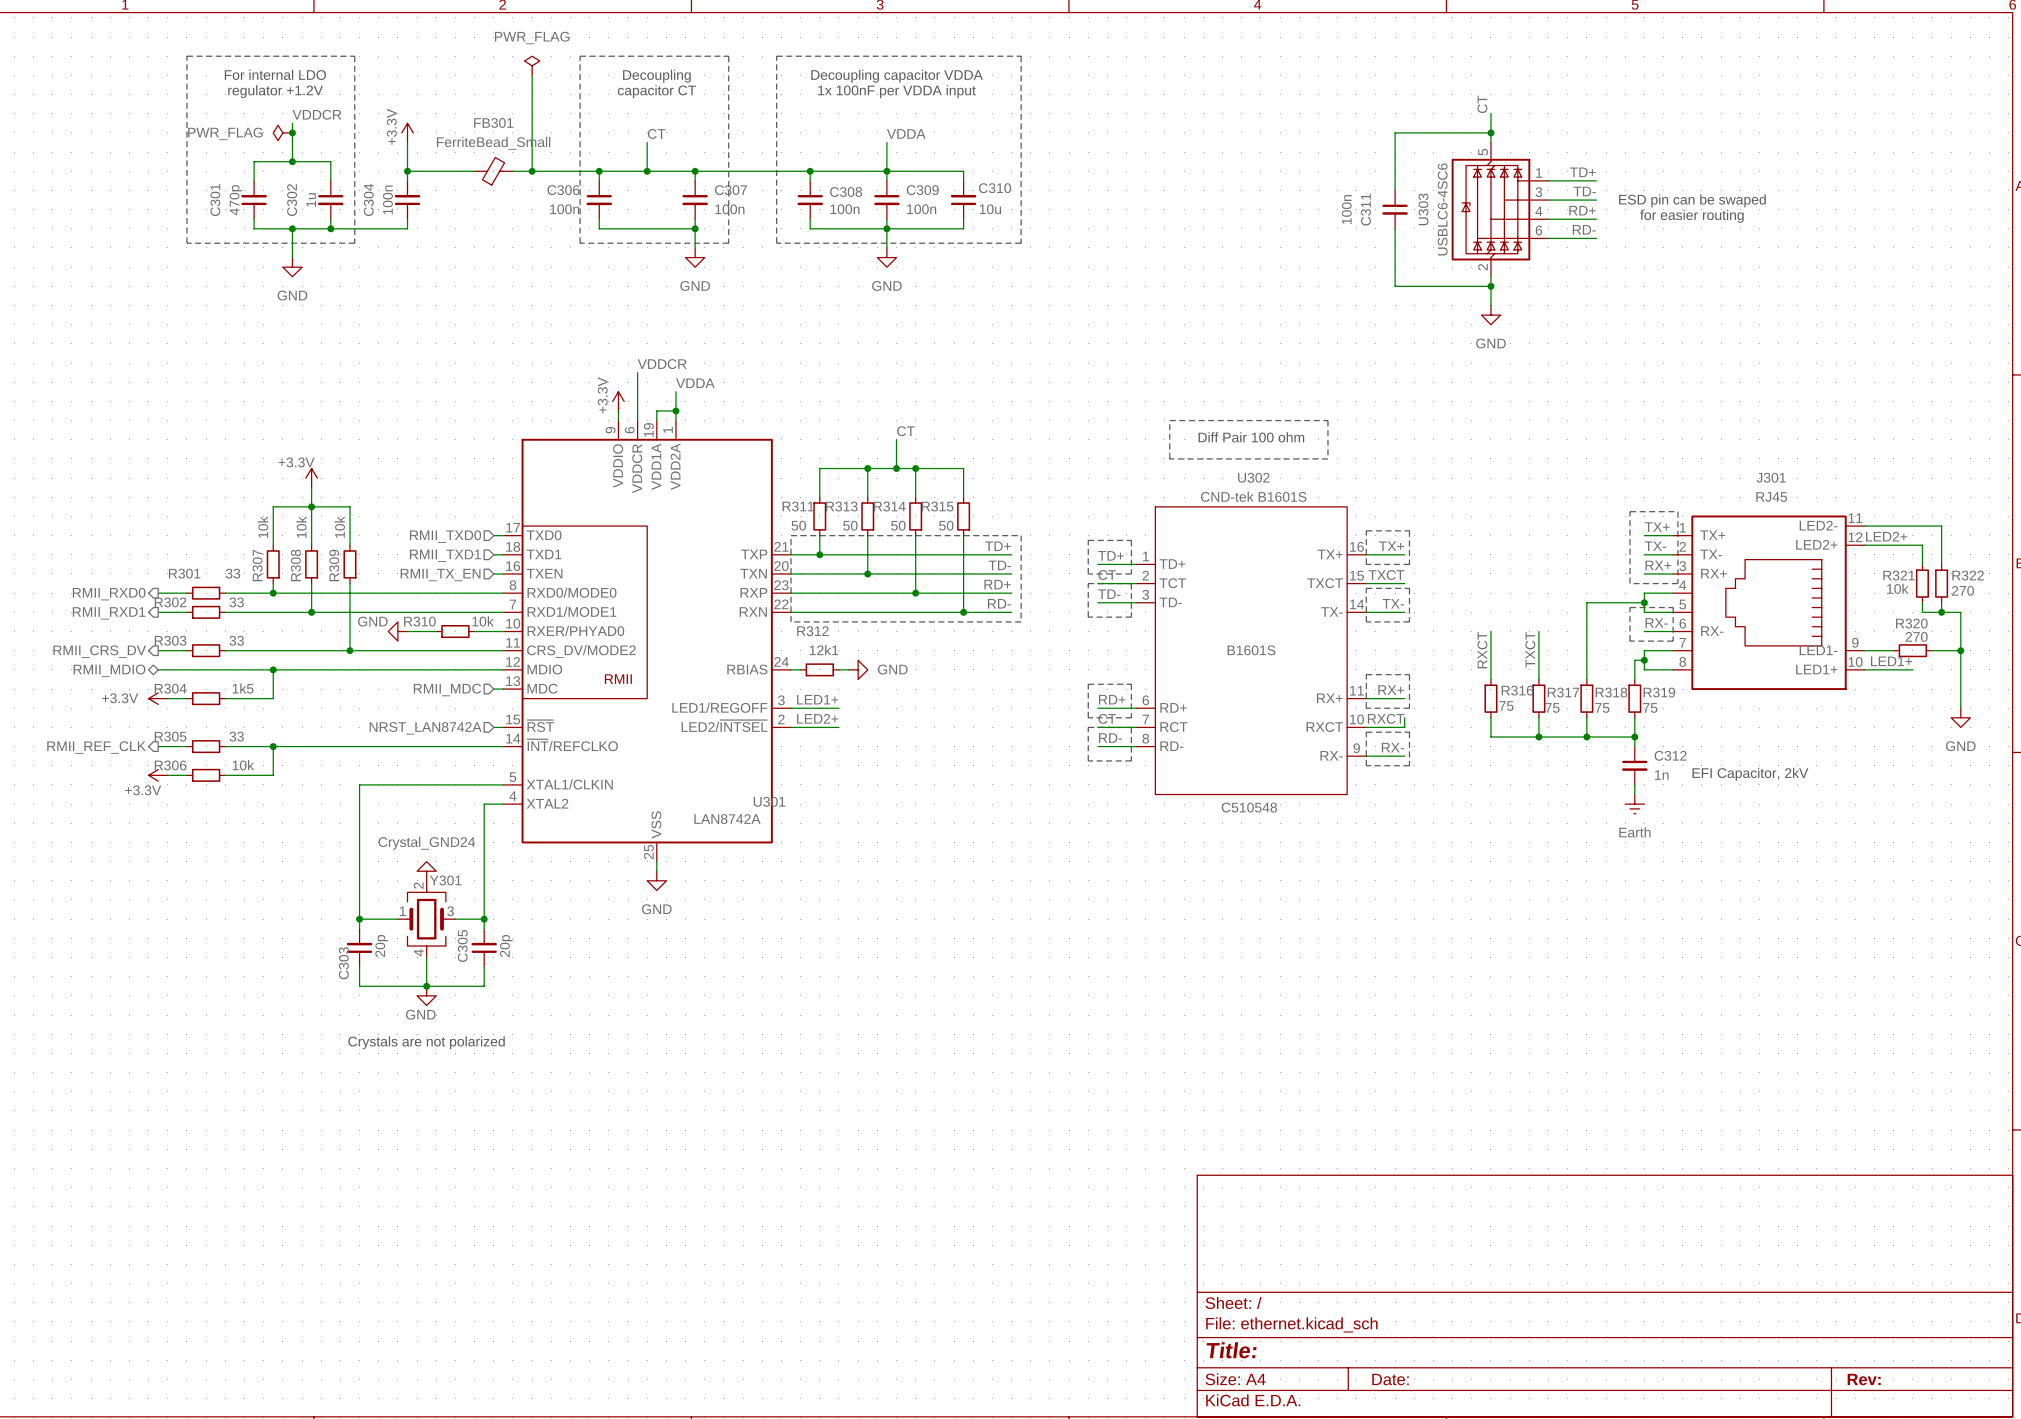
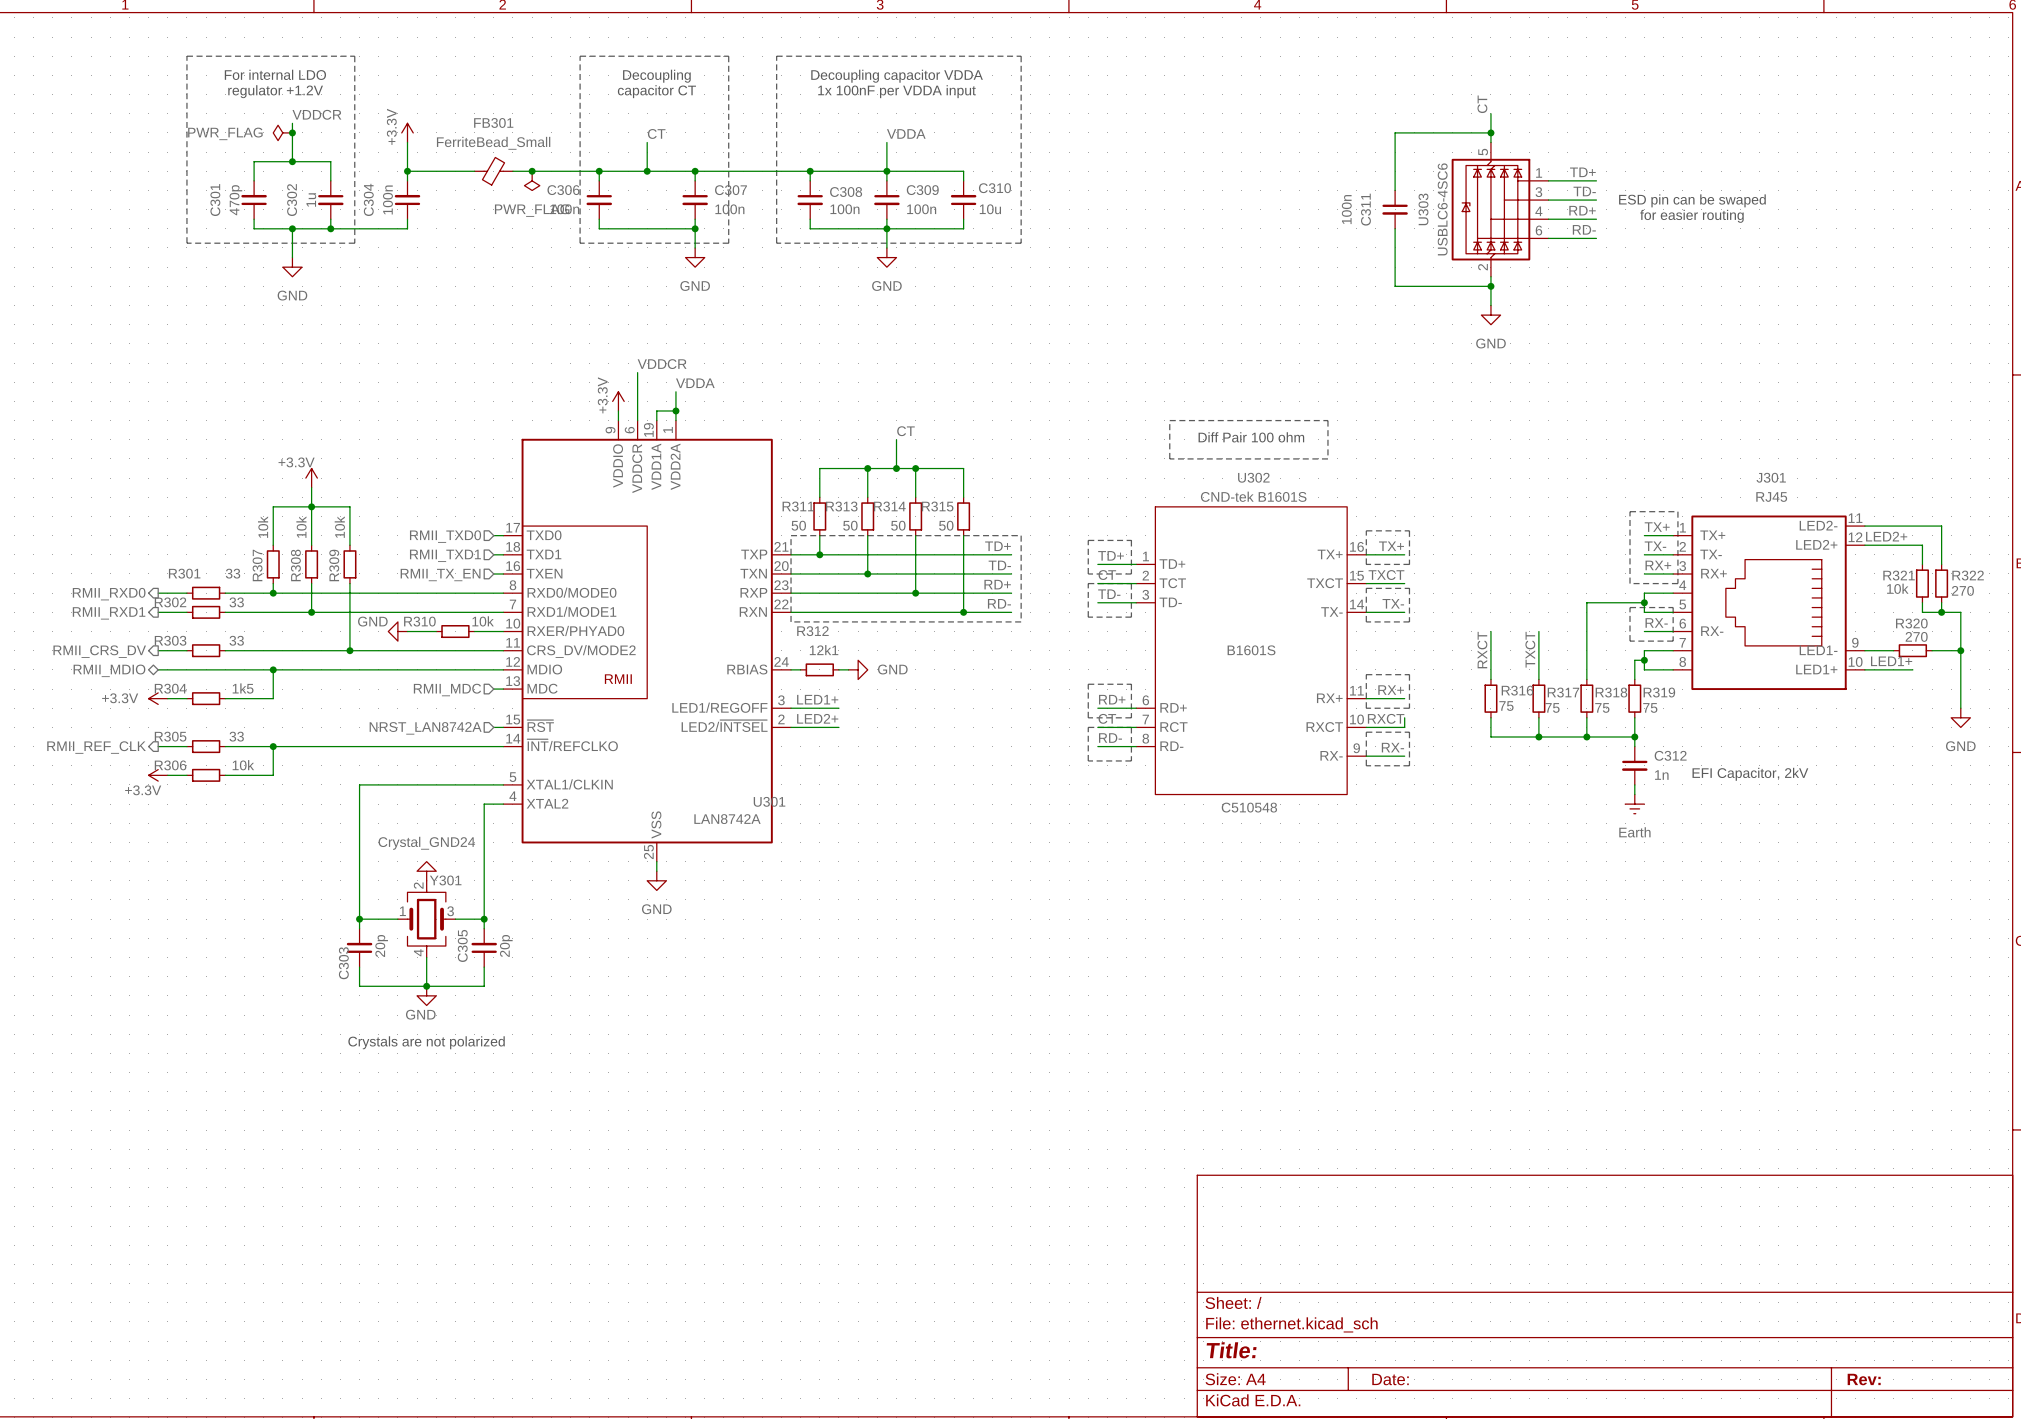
power symbol rotation: 0° (532, 65) -> 180° (532, 180)
power symbol position: PWR_FLAG (532, 65) -> PWR_FLAG (532, 180)
wire: (532, 75) (532, 171) -> none

